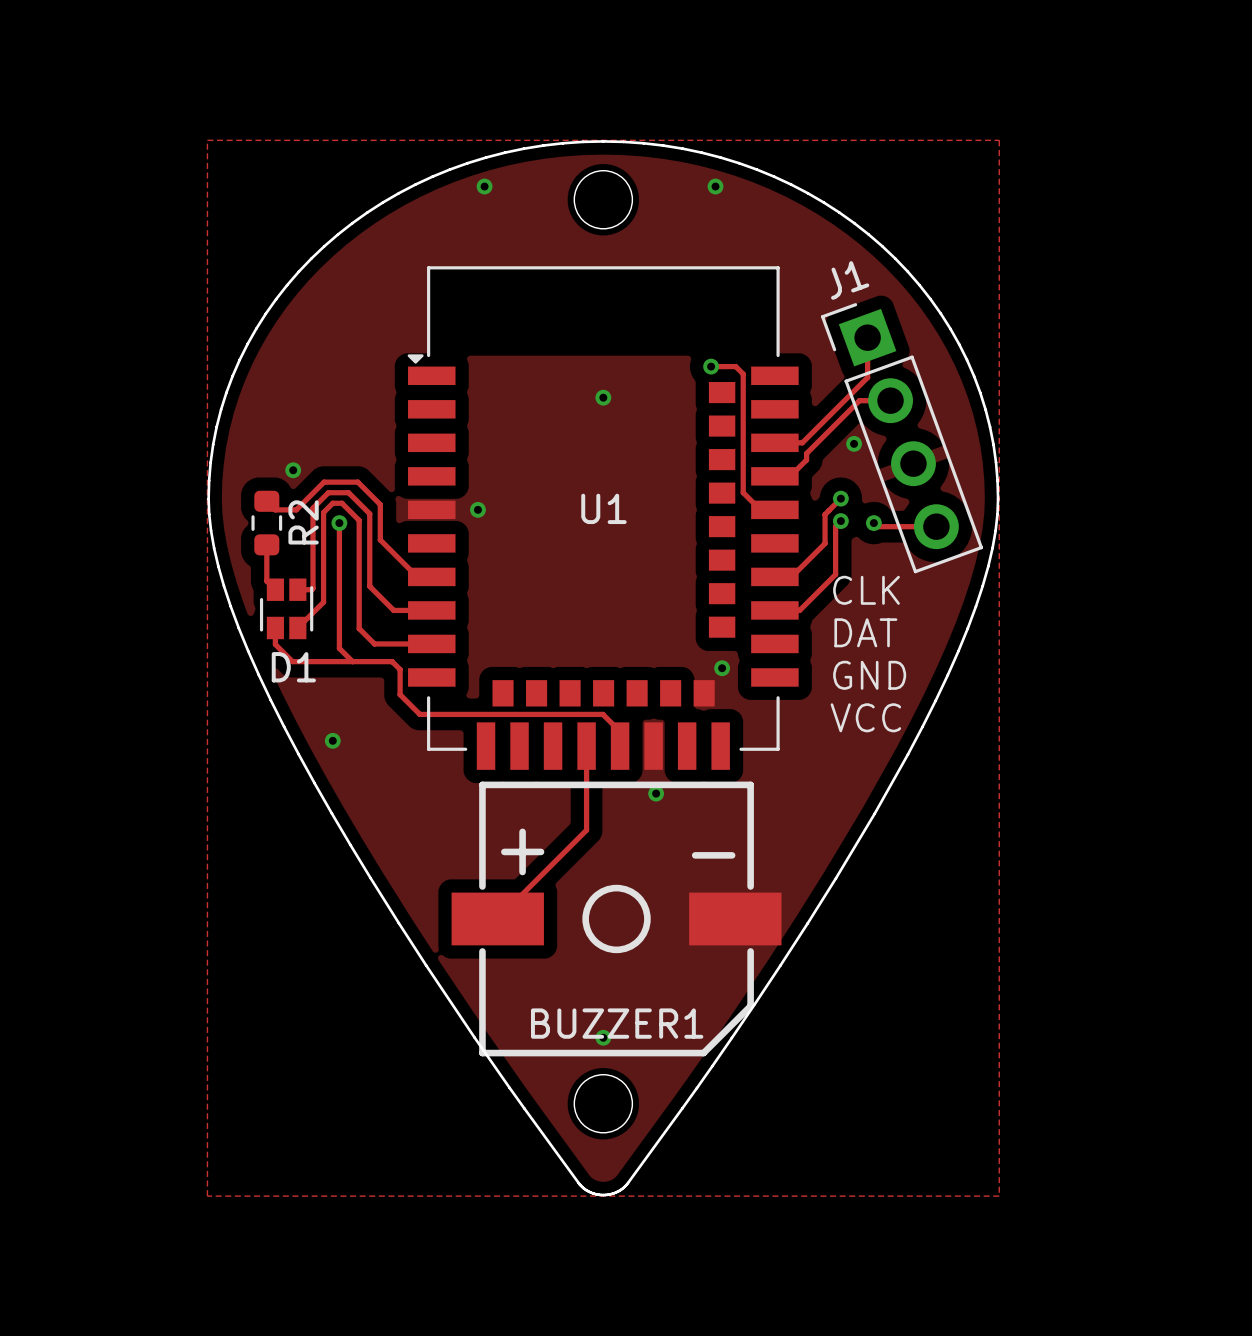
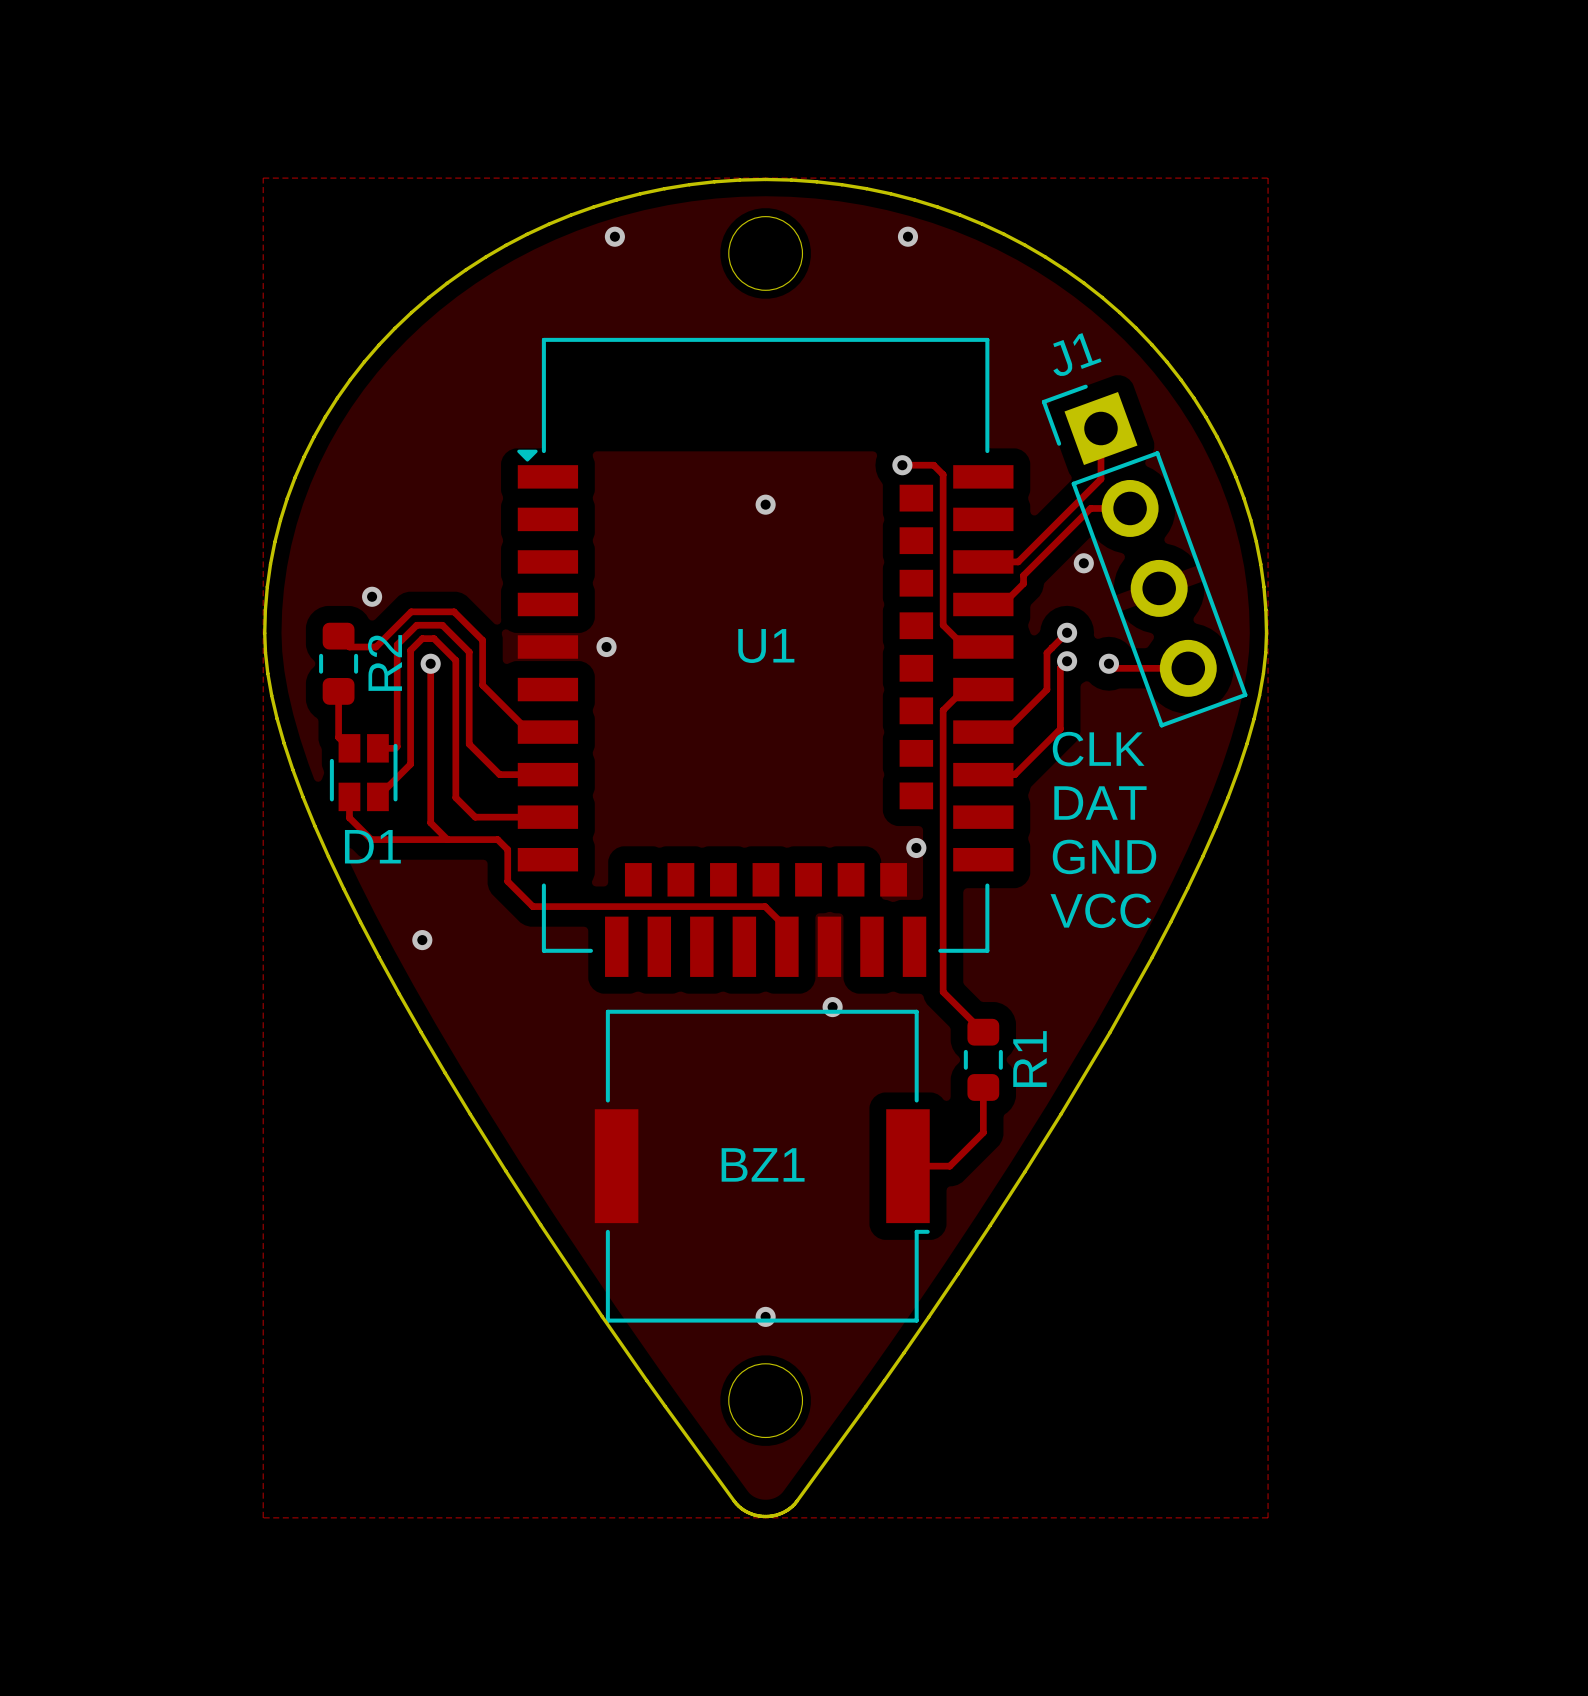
track: none -> (983, 689) (963, 689) (943, 710) (943, 992) (983, 1032)
track: (586, 746) (586, 830) (497, 918) -> none
R1: none -> (983, 1059)
track: none -> (983, 1087) (983, 1132) (949, 1166) (907, 1166)
BZ1: none -> (762, 1166)
BUZZER1: (616, 918) -> none

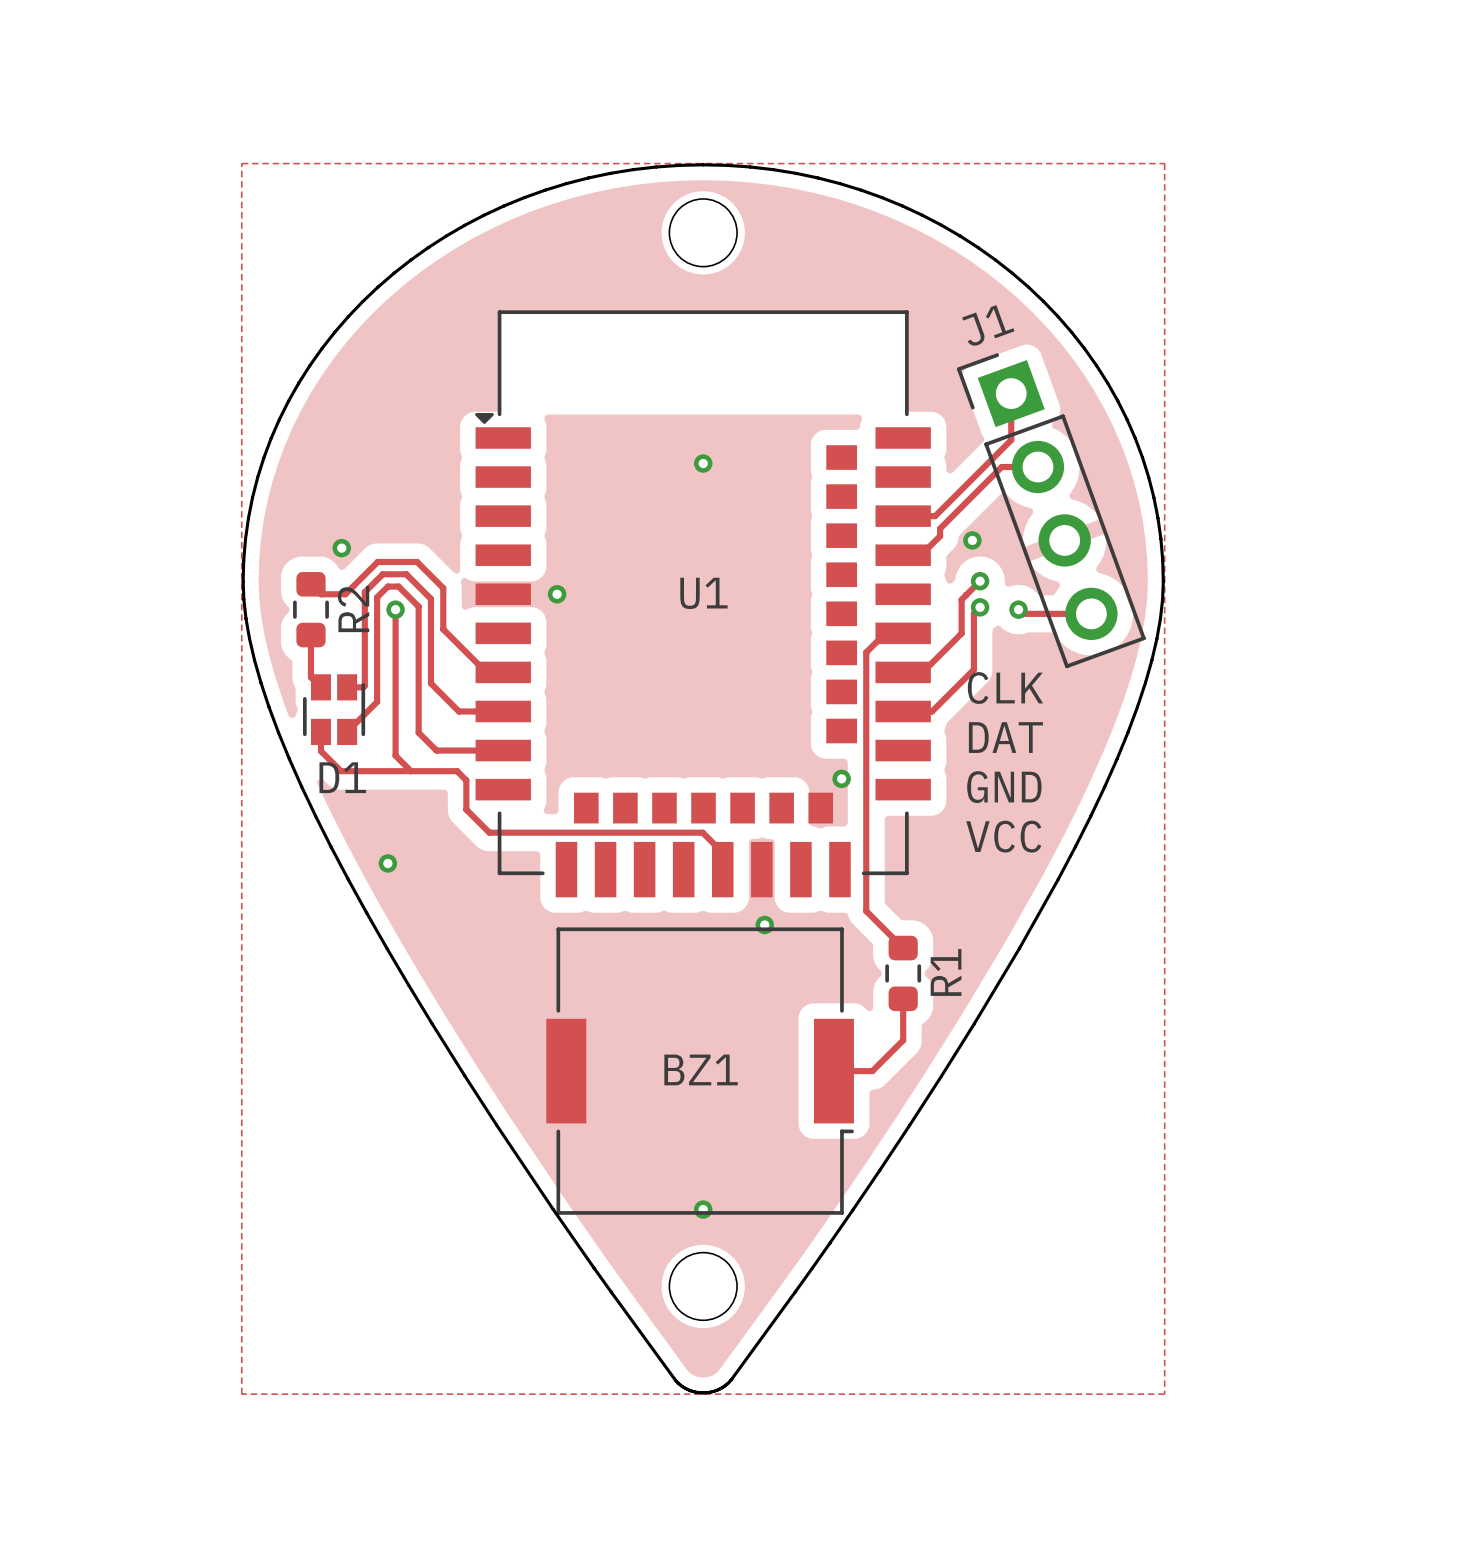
via: (614, 236) -> none
via: (907, 236) -> none
track: (902, 465) (933, 465) (943, 474) (943, 625) (964, 647) (983, 647) -> none
via: (902, 465) -> none
via position: (1083, 563) -> (972, 540)

